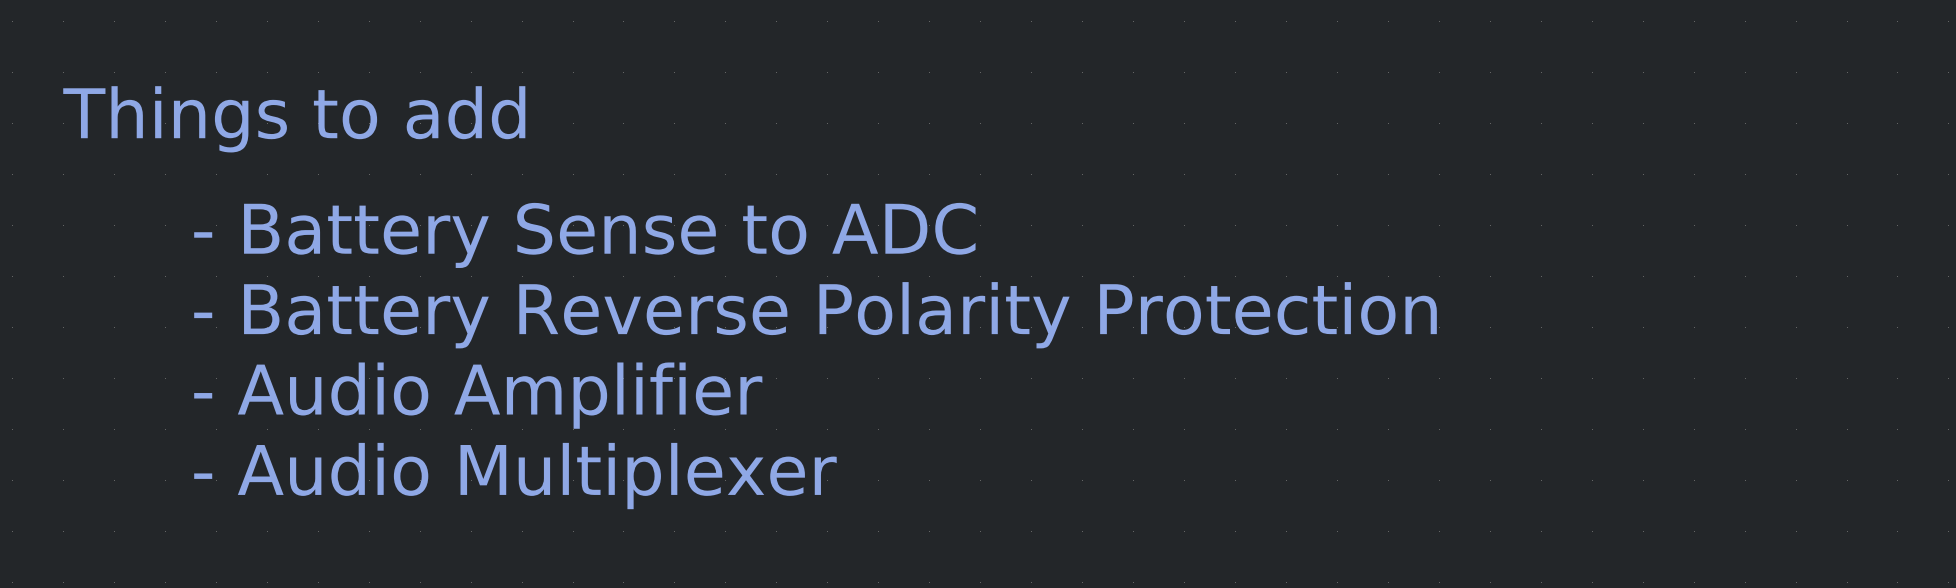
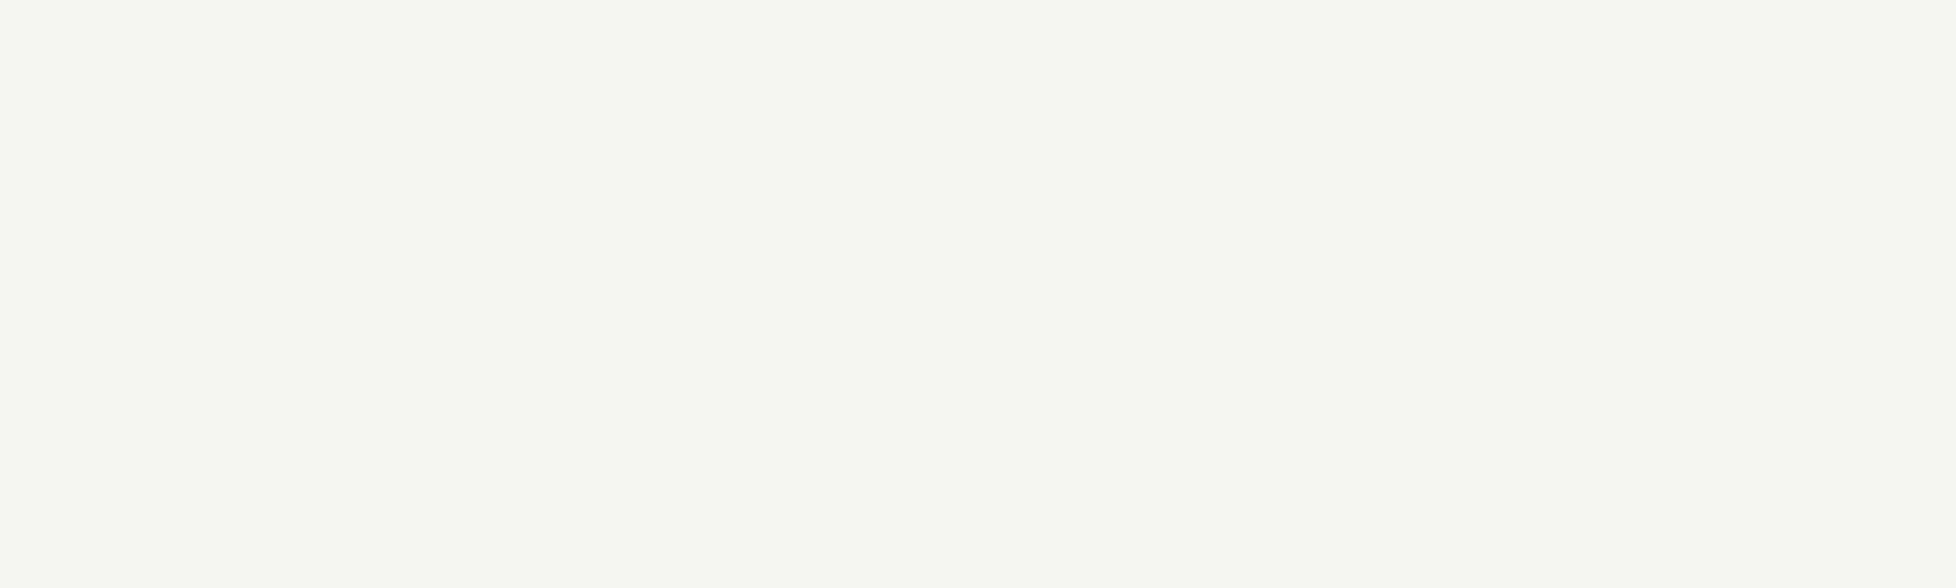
text: Things to add (294, 119) -> none
text: - Battery Sense to ADC (584, 235) -> none
text: - Battery Reverse Polarity Protection (815, 315) -> none
text: - Audio Amplifier (478, 395) -> none
text: - Audio Multiplexer (515, 476) -> none

